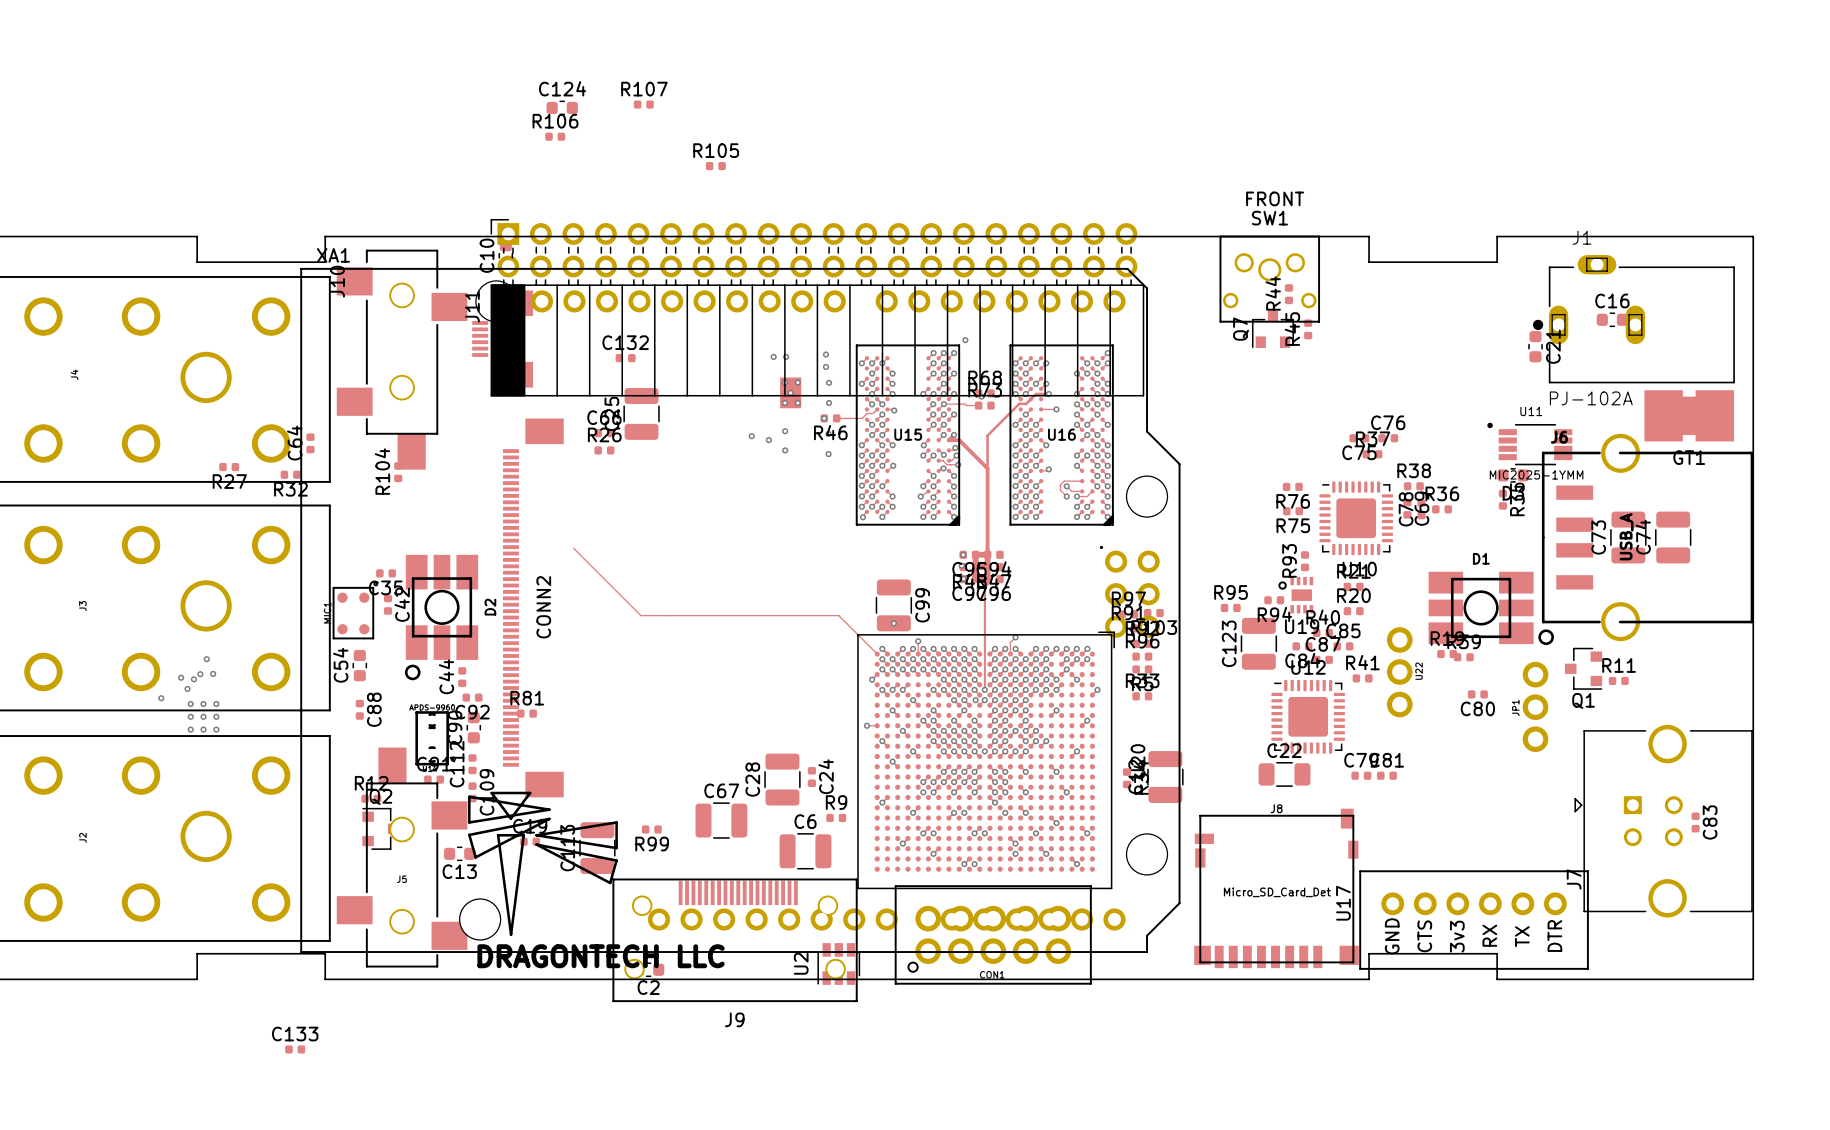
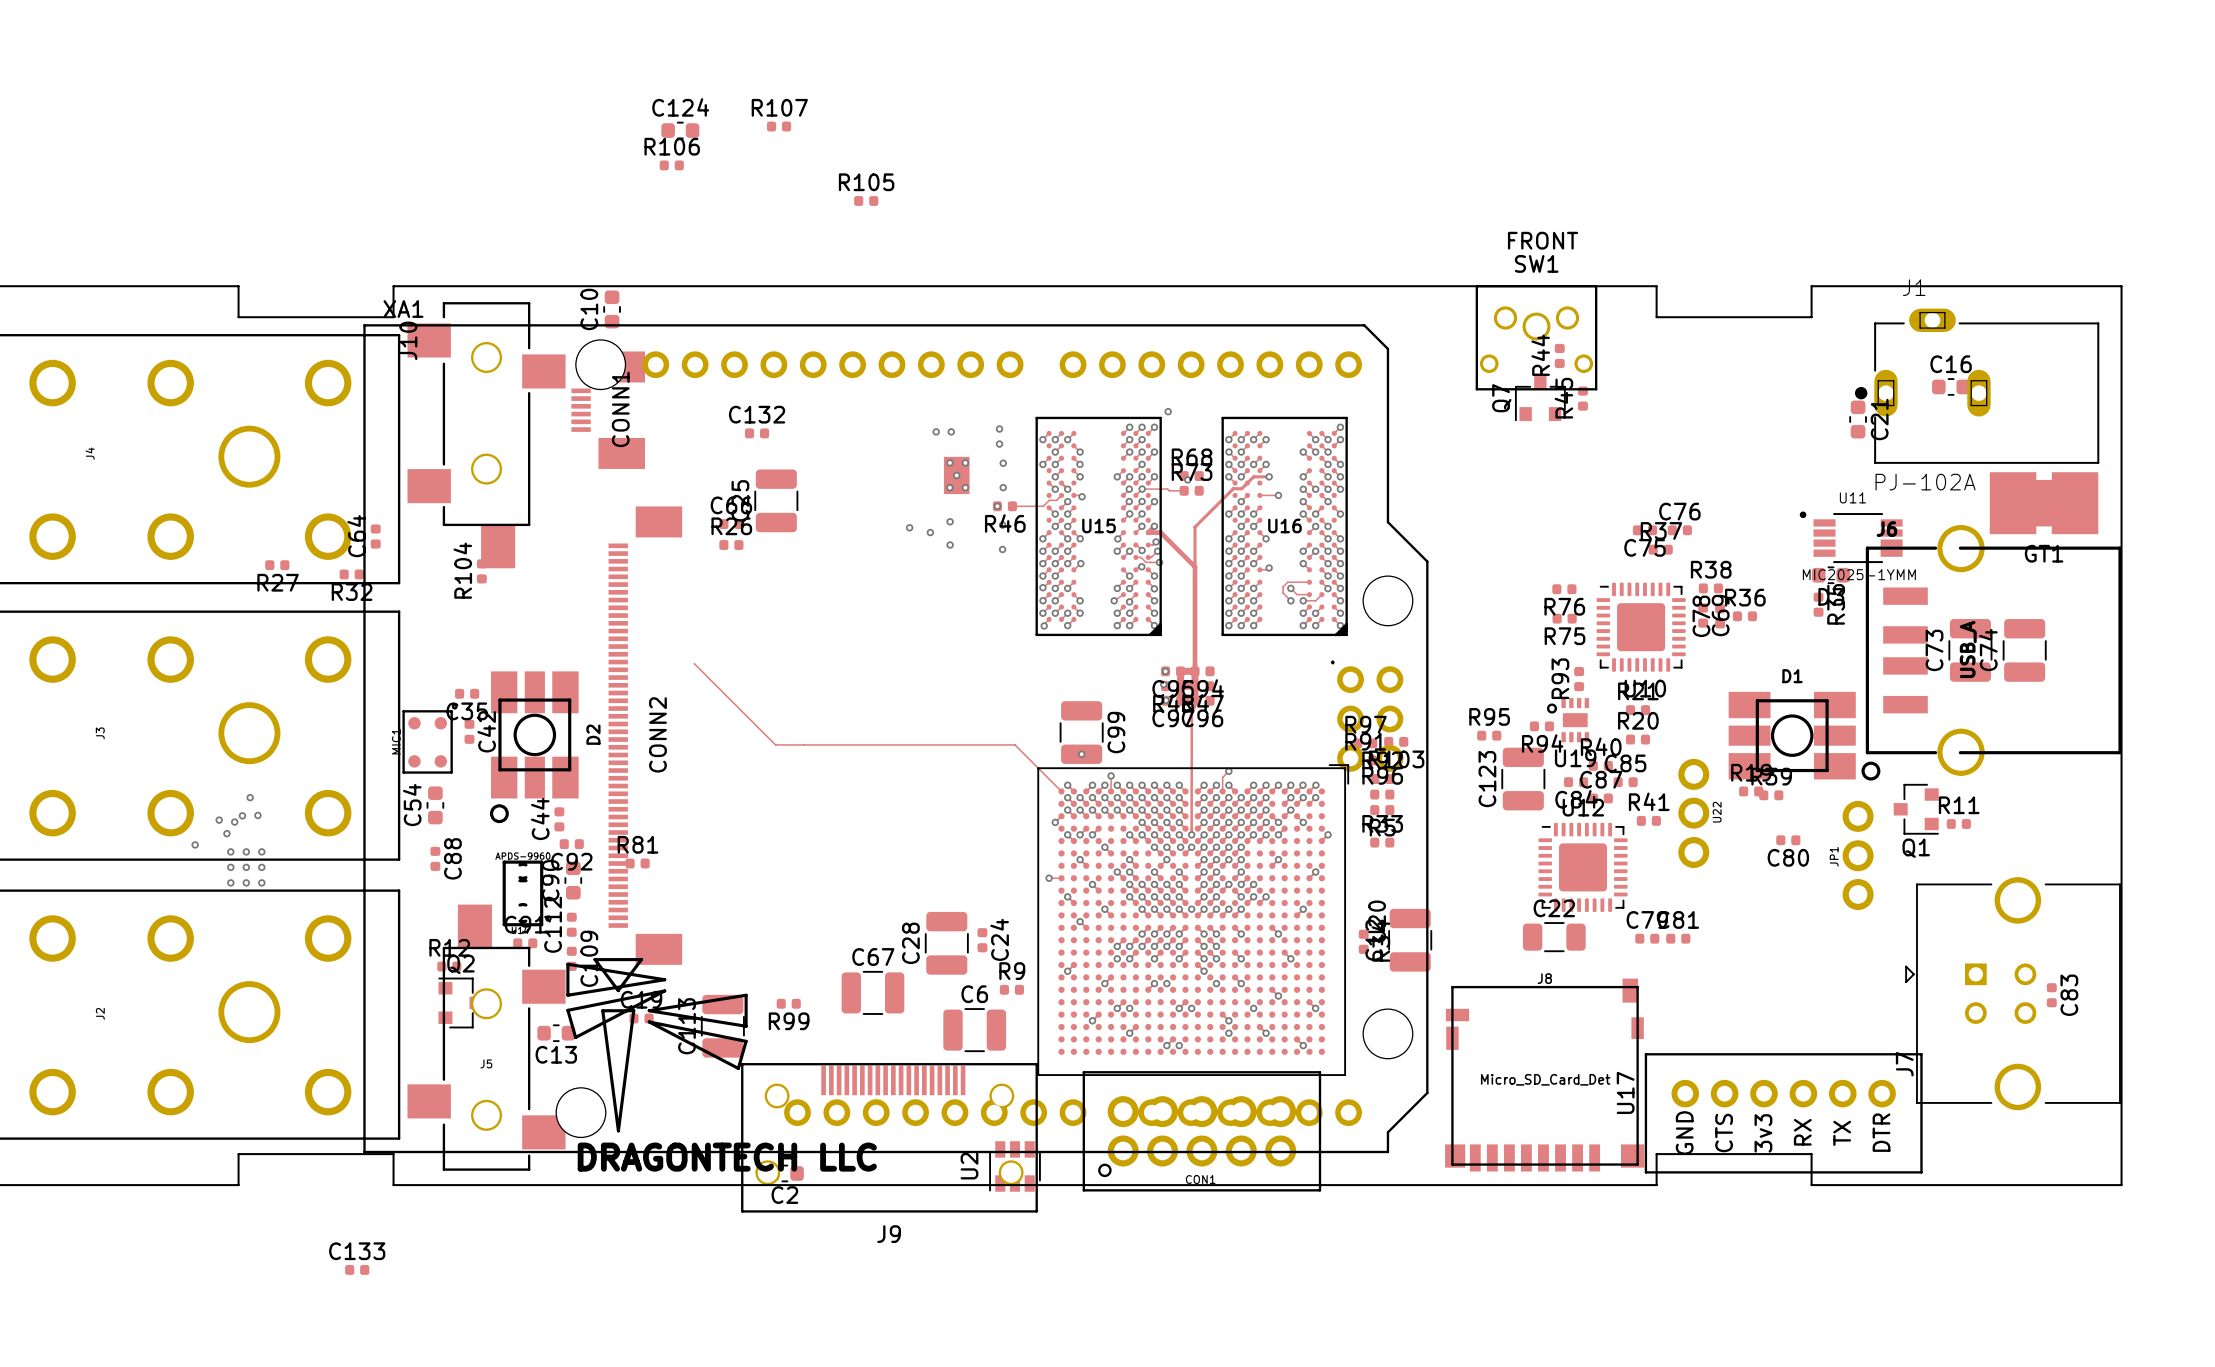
J11: (817, 307) -> none

